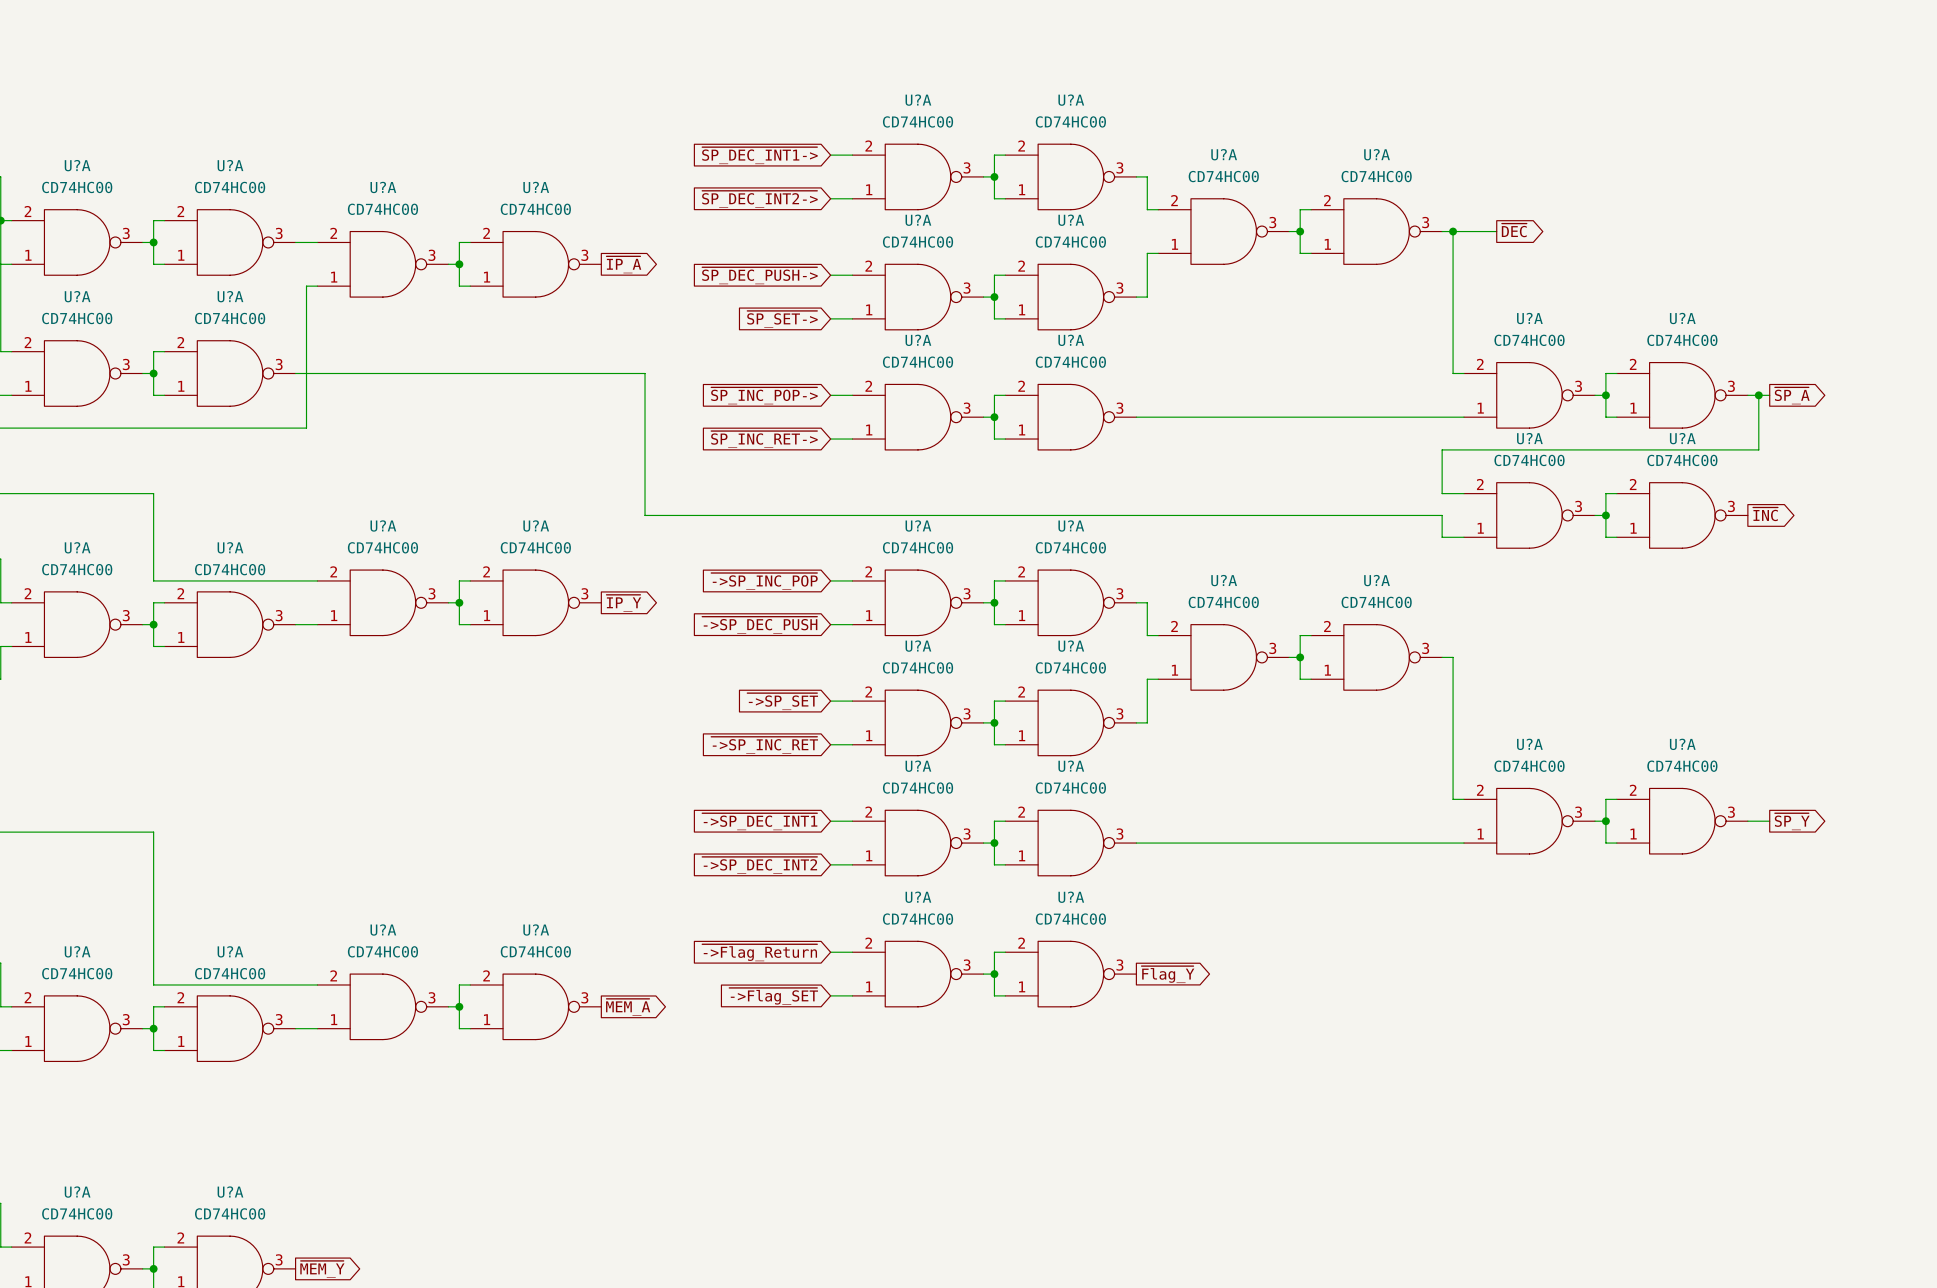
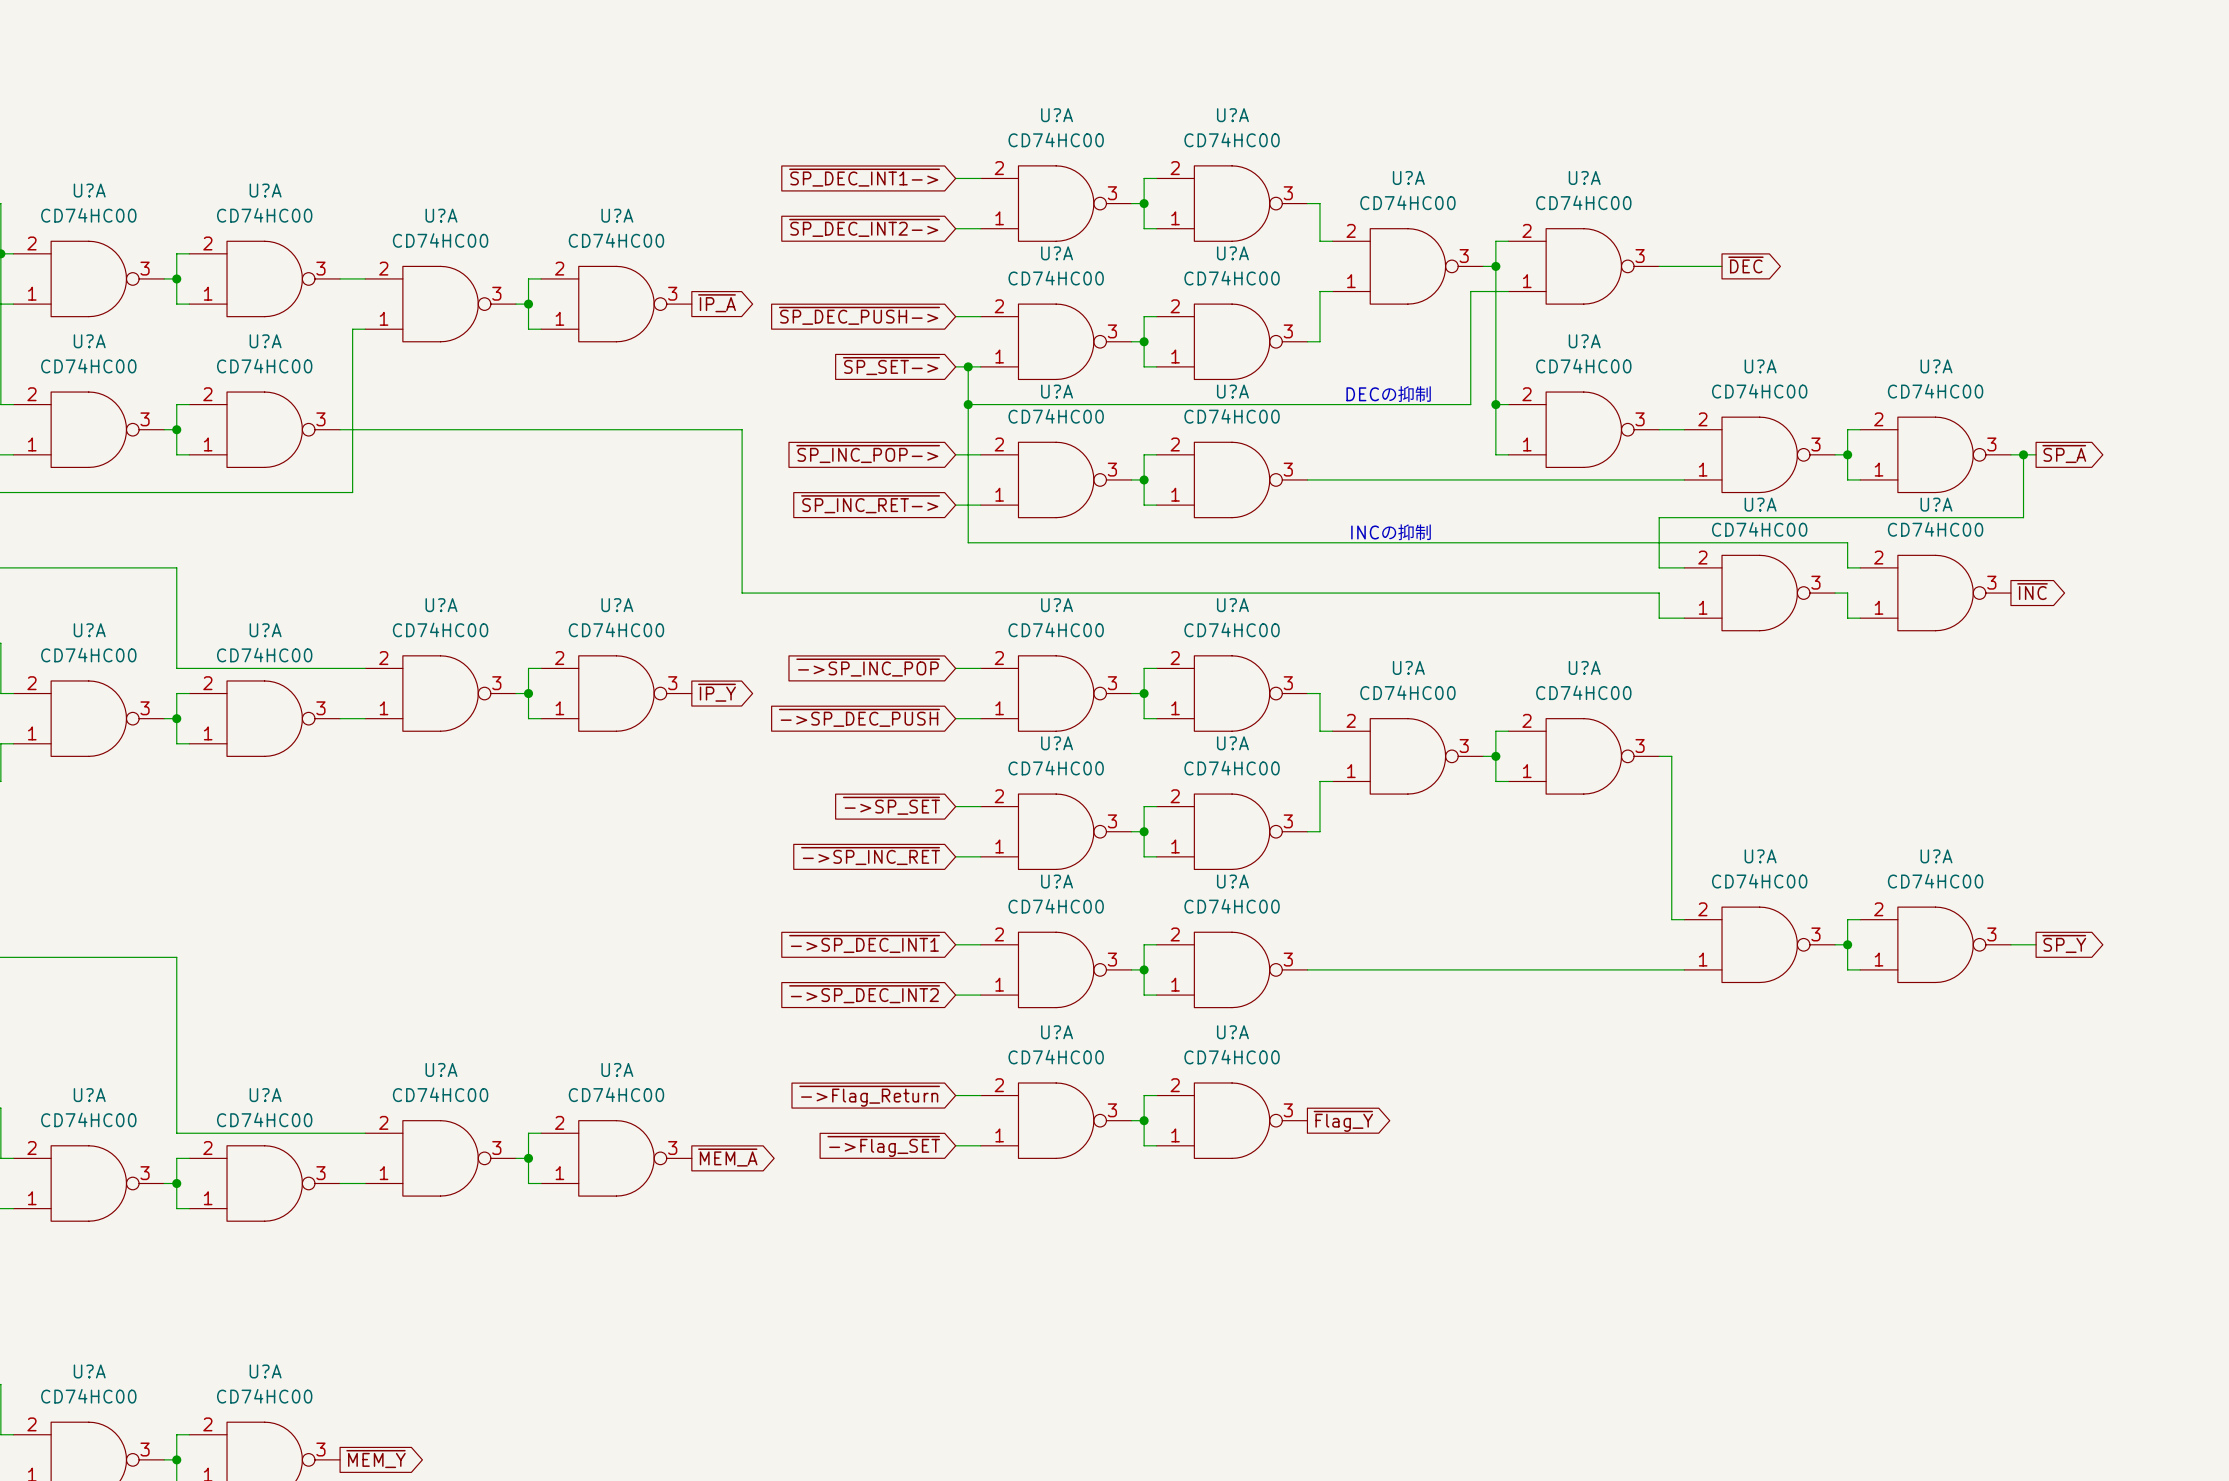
wire: (1453, 231) (1453, 373) -> (1659, 429) (1671, 429)
junction: (1453, 231) -> none
junction: none -> (968, 366)
text: none -> DECの抑制 (1388, 394)
wire: none -> (968, 404) (1470, 404) (1470, 291) (1495, 291) (1495, 454) (1508, 454)
junction: none -> (968, 404)
wire: none -> (1495, 404) (1508, 404)
junction: none -> (1495, 404)
U?A: none -> CD74HC00 (1583, 429)
text: none -> INCの抑制 (1391, 532)
wire: (1605, 493) (1605, 515) -> (1847, 567) (1847, 542) (968, 542) (968, 366)
junction: (1605, 515) -> none

